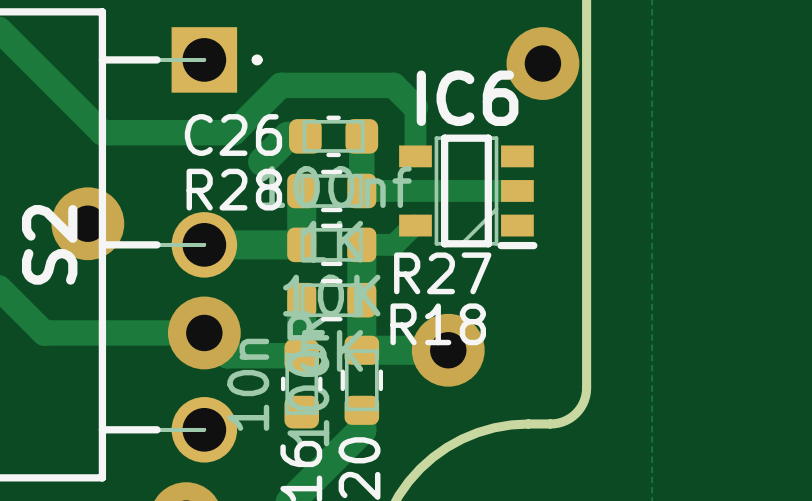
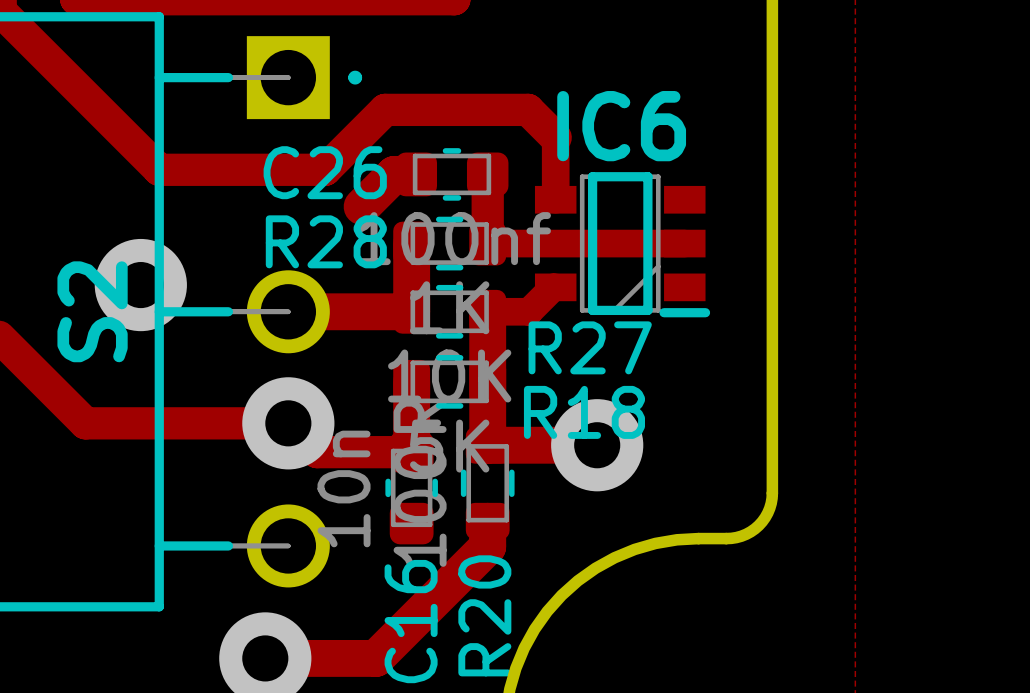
via: (542, 63) -> none

